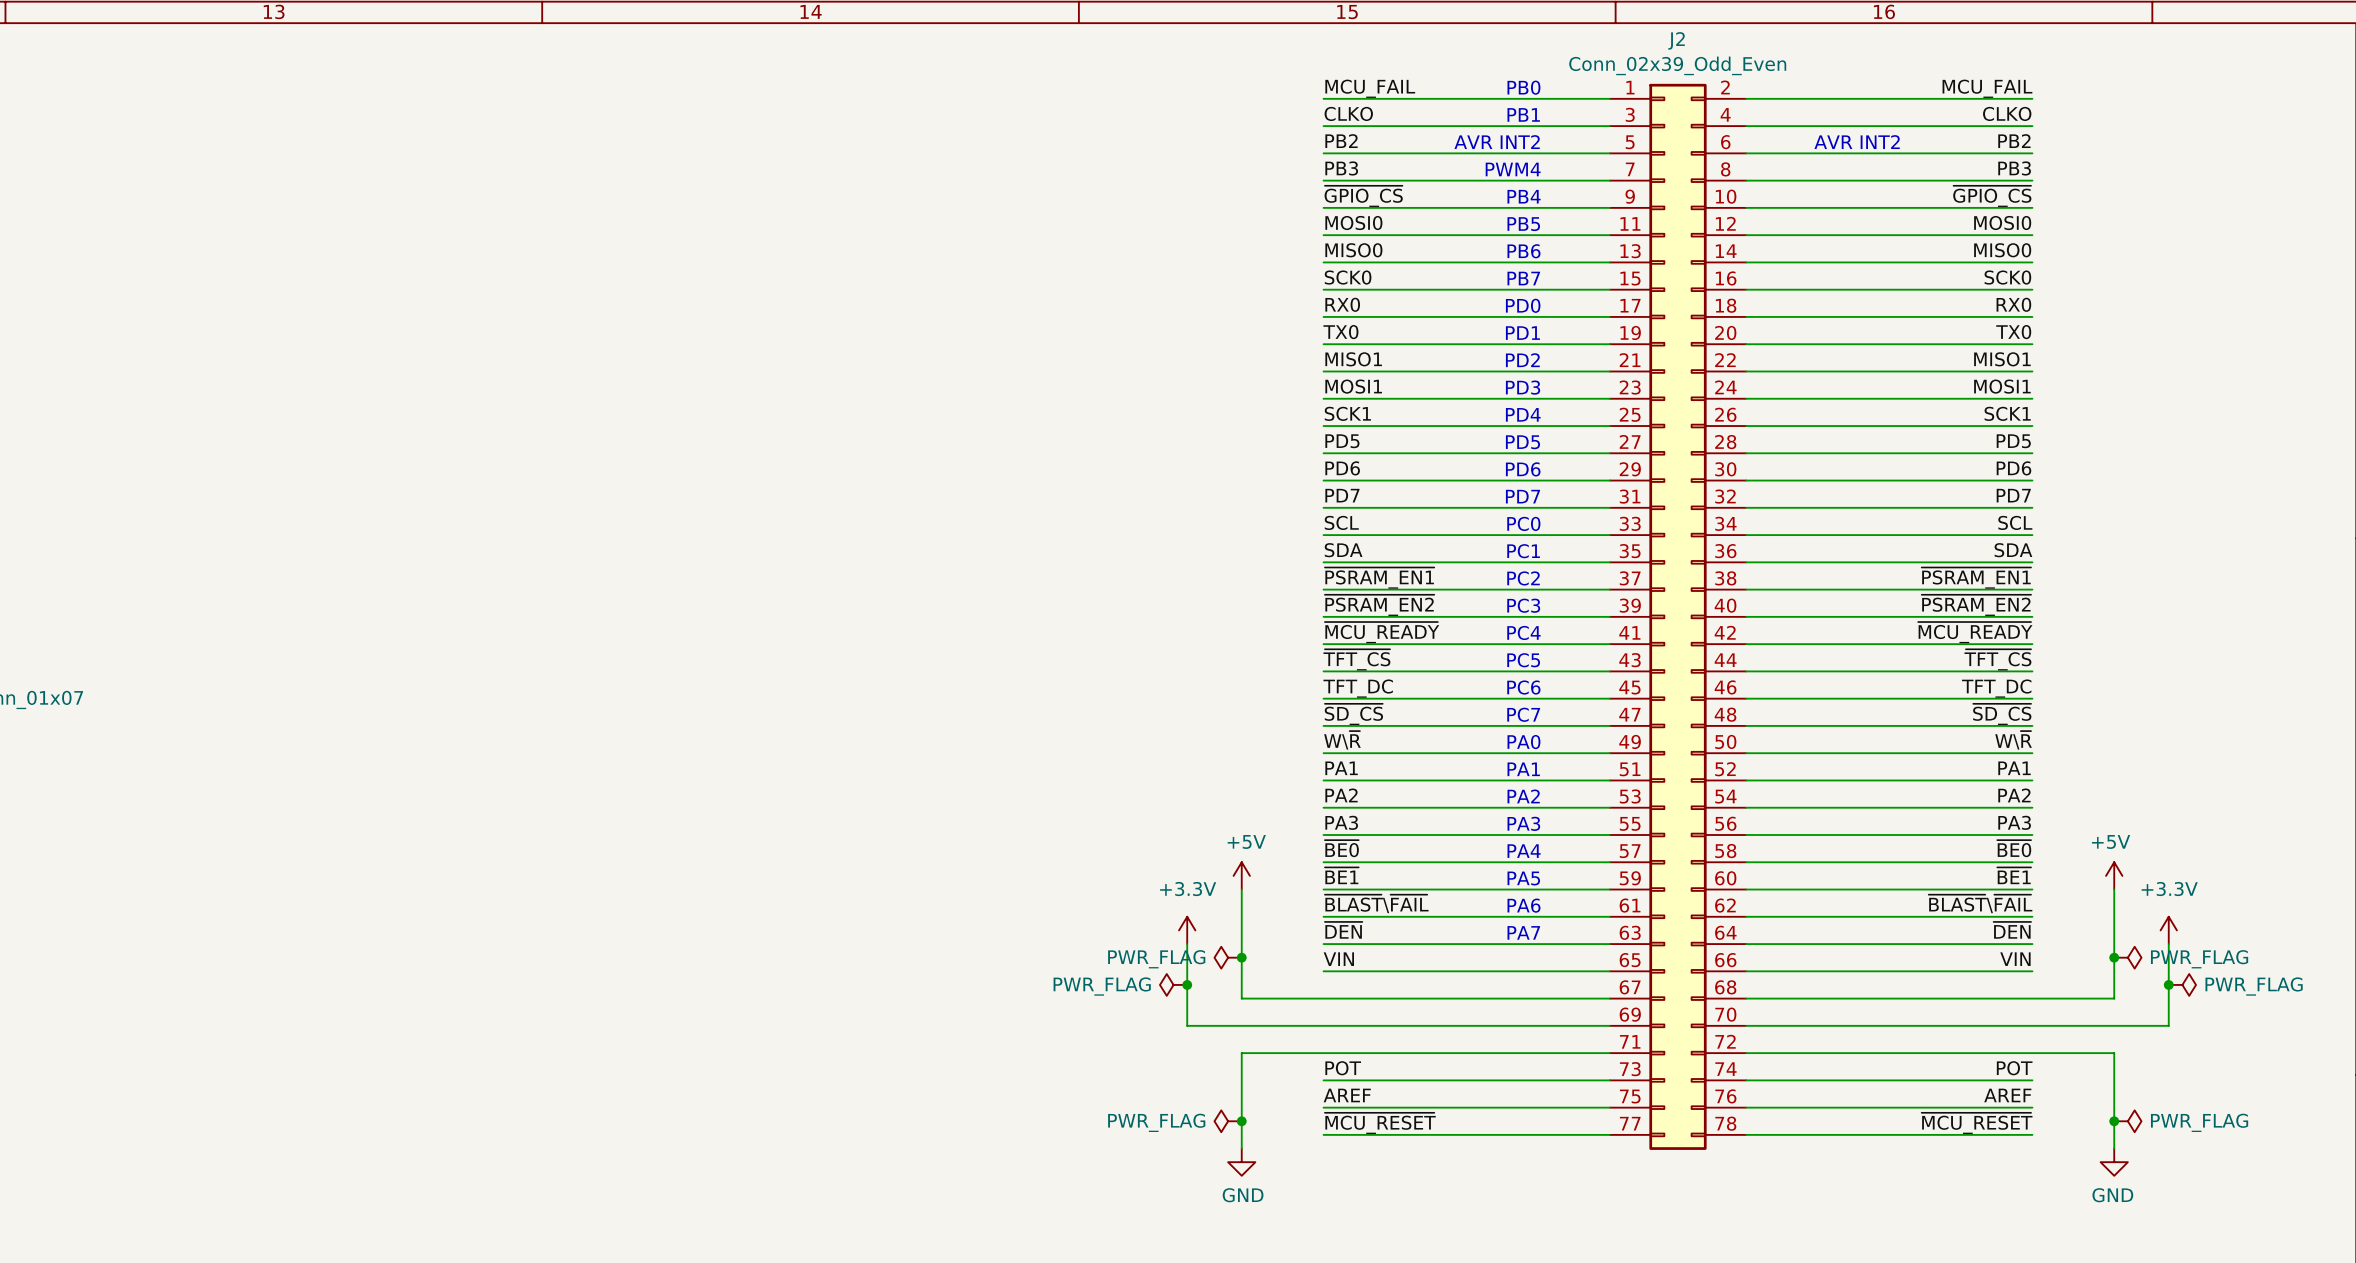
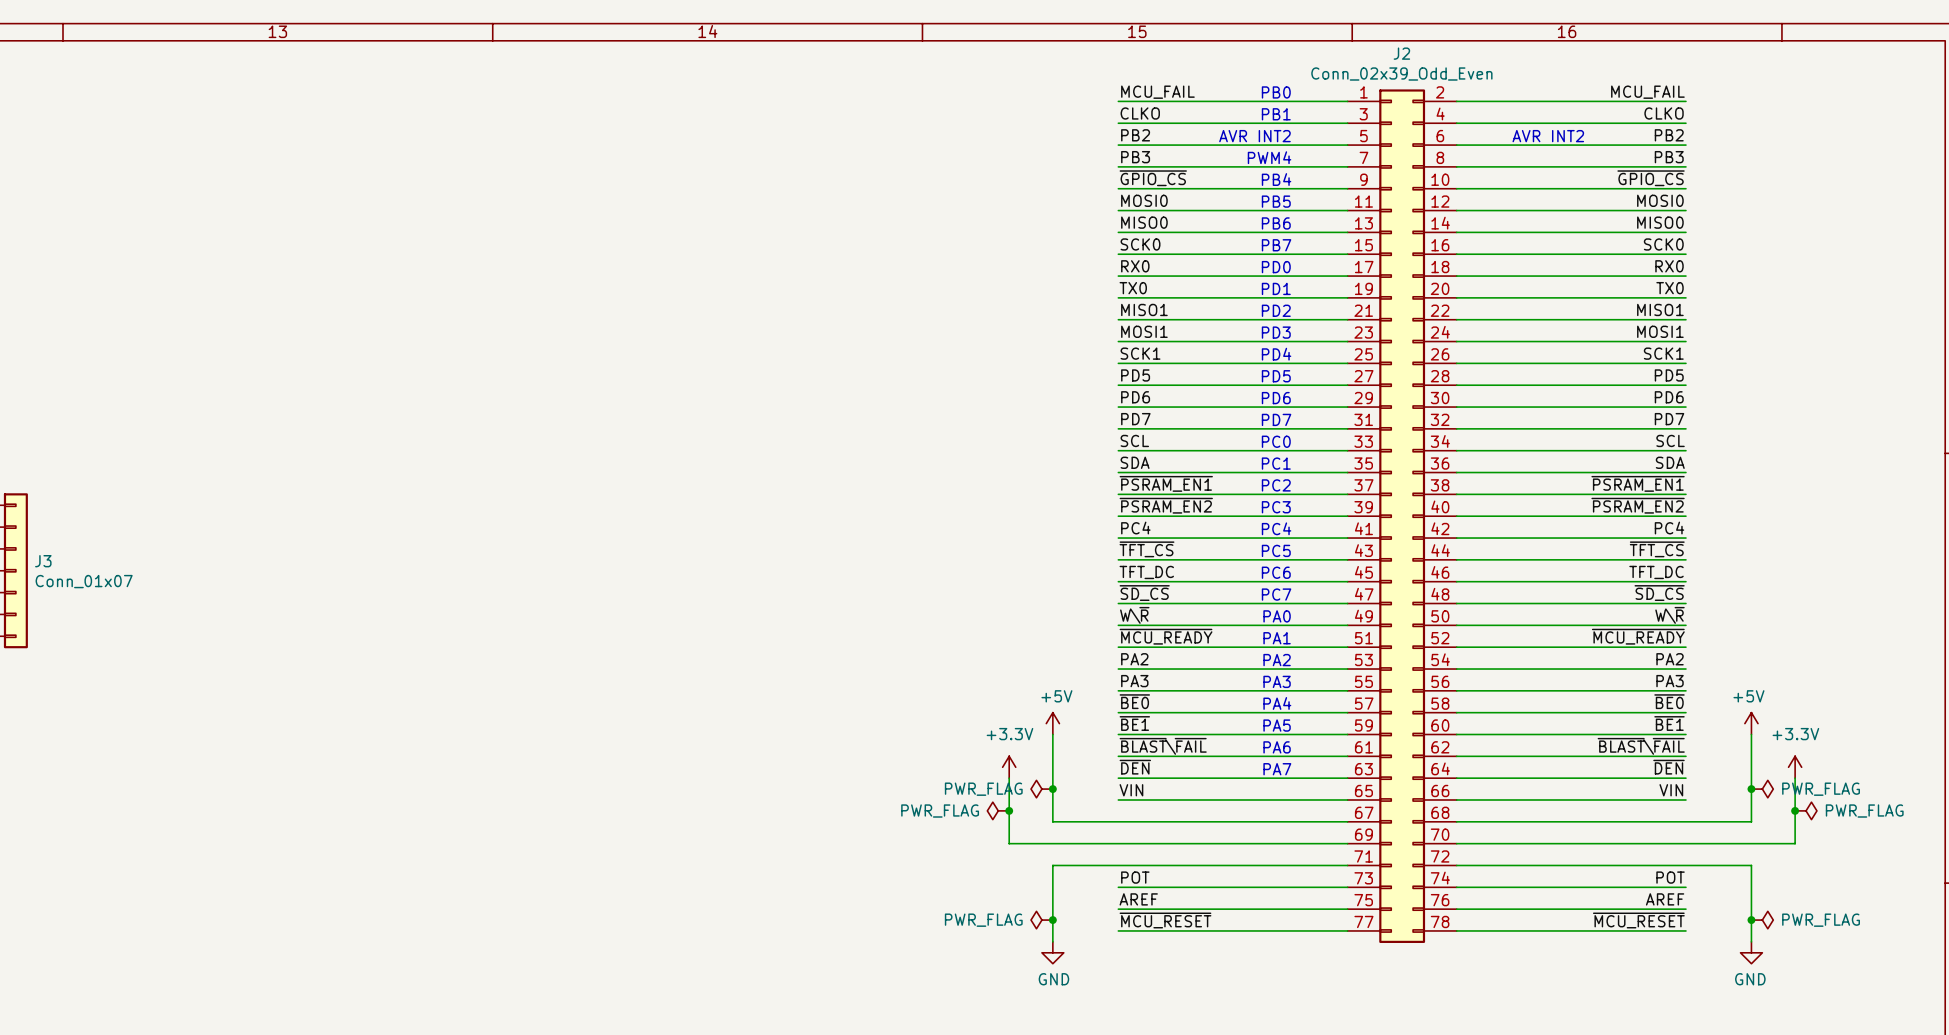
label: ~{MCU_READY} (1382, 632) -> PC4 (1135, 528)
label: ~{MCU_READY} (1975, 632) -> PC4 (1669, 528)
label: PA1 (1341, 768) -> ~{MCU_READY} (1166, 636)
label: PA1 (2014, 768) -> ~{MCU_READY} (1638, 636)

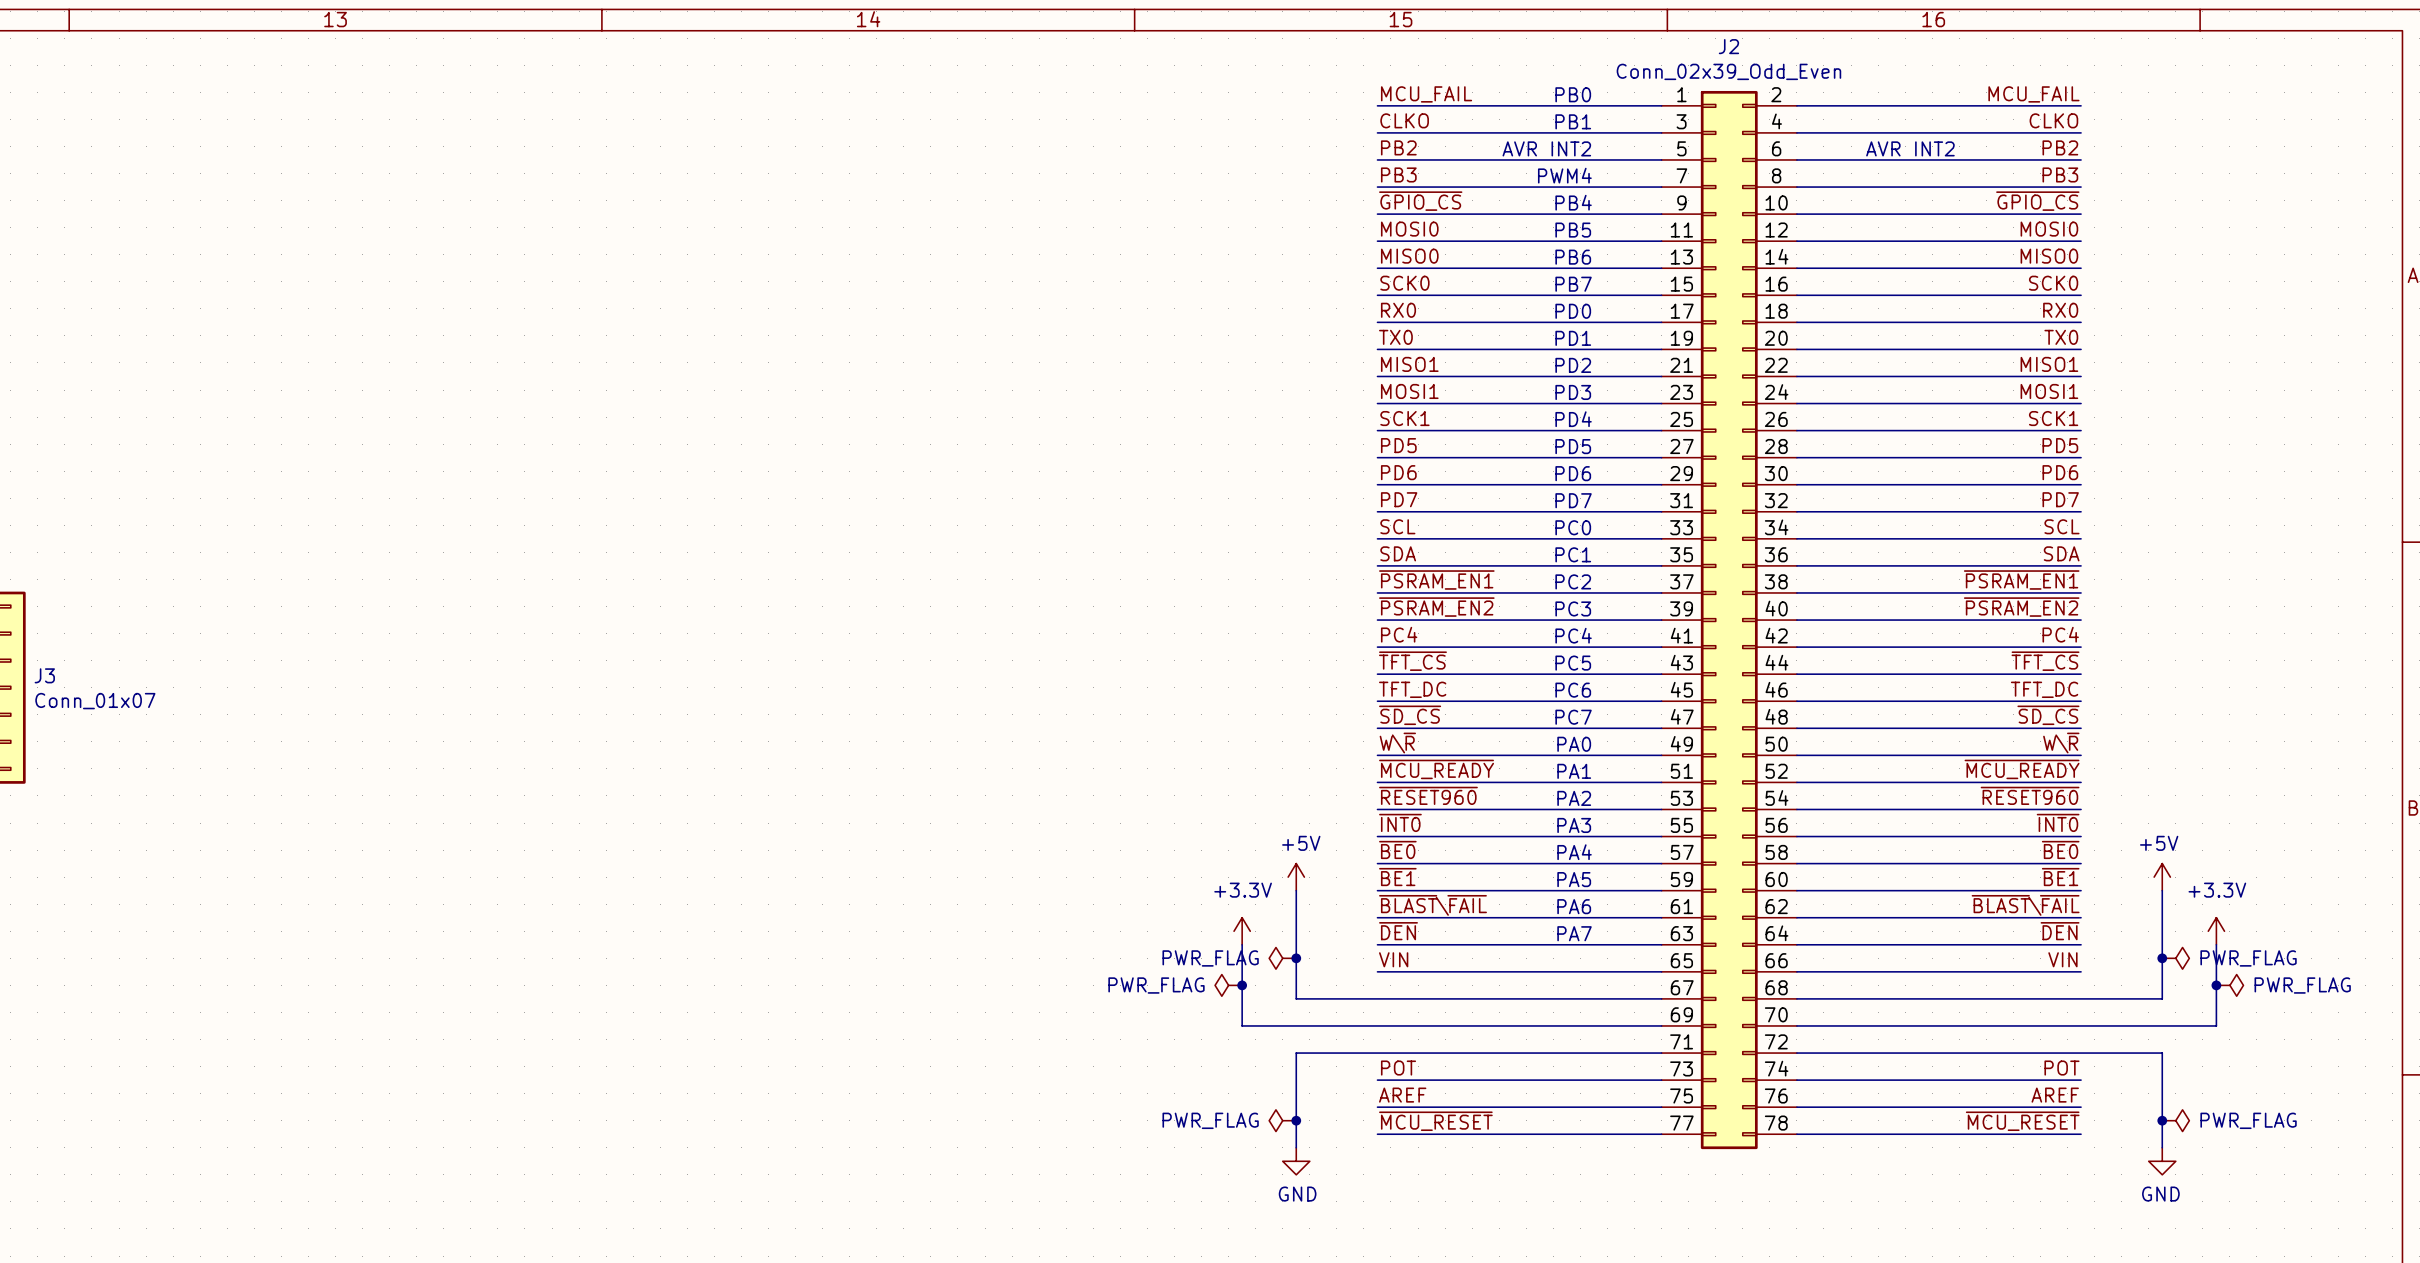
label: PA2 (1134, 659) -> ~{RESET960} (1428, 795)
label: PA2 (1670, 659) -> ~{RESET960} (2030, 795)
label: PA3 (1134, 681) -> ~{INT0} (1400, 822)
label: PA3 (1670, 681) -> ~{INT0} (2058, 822)

